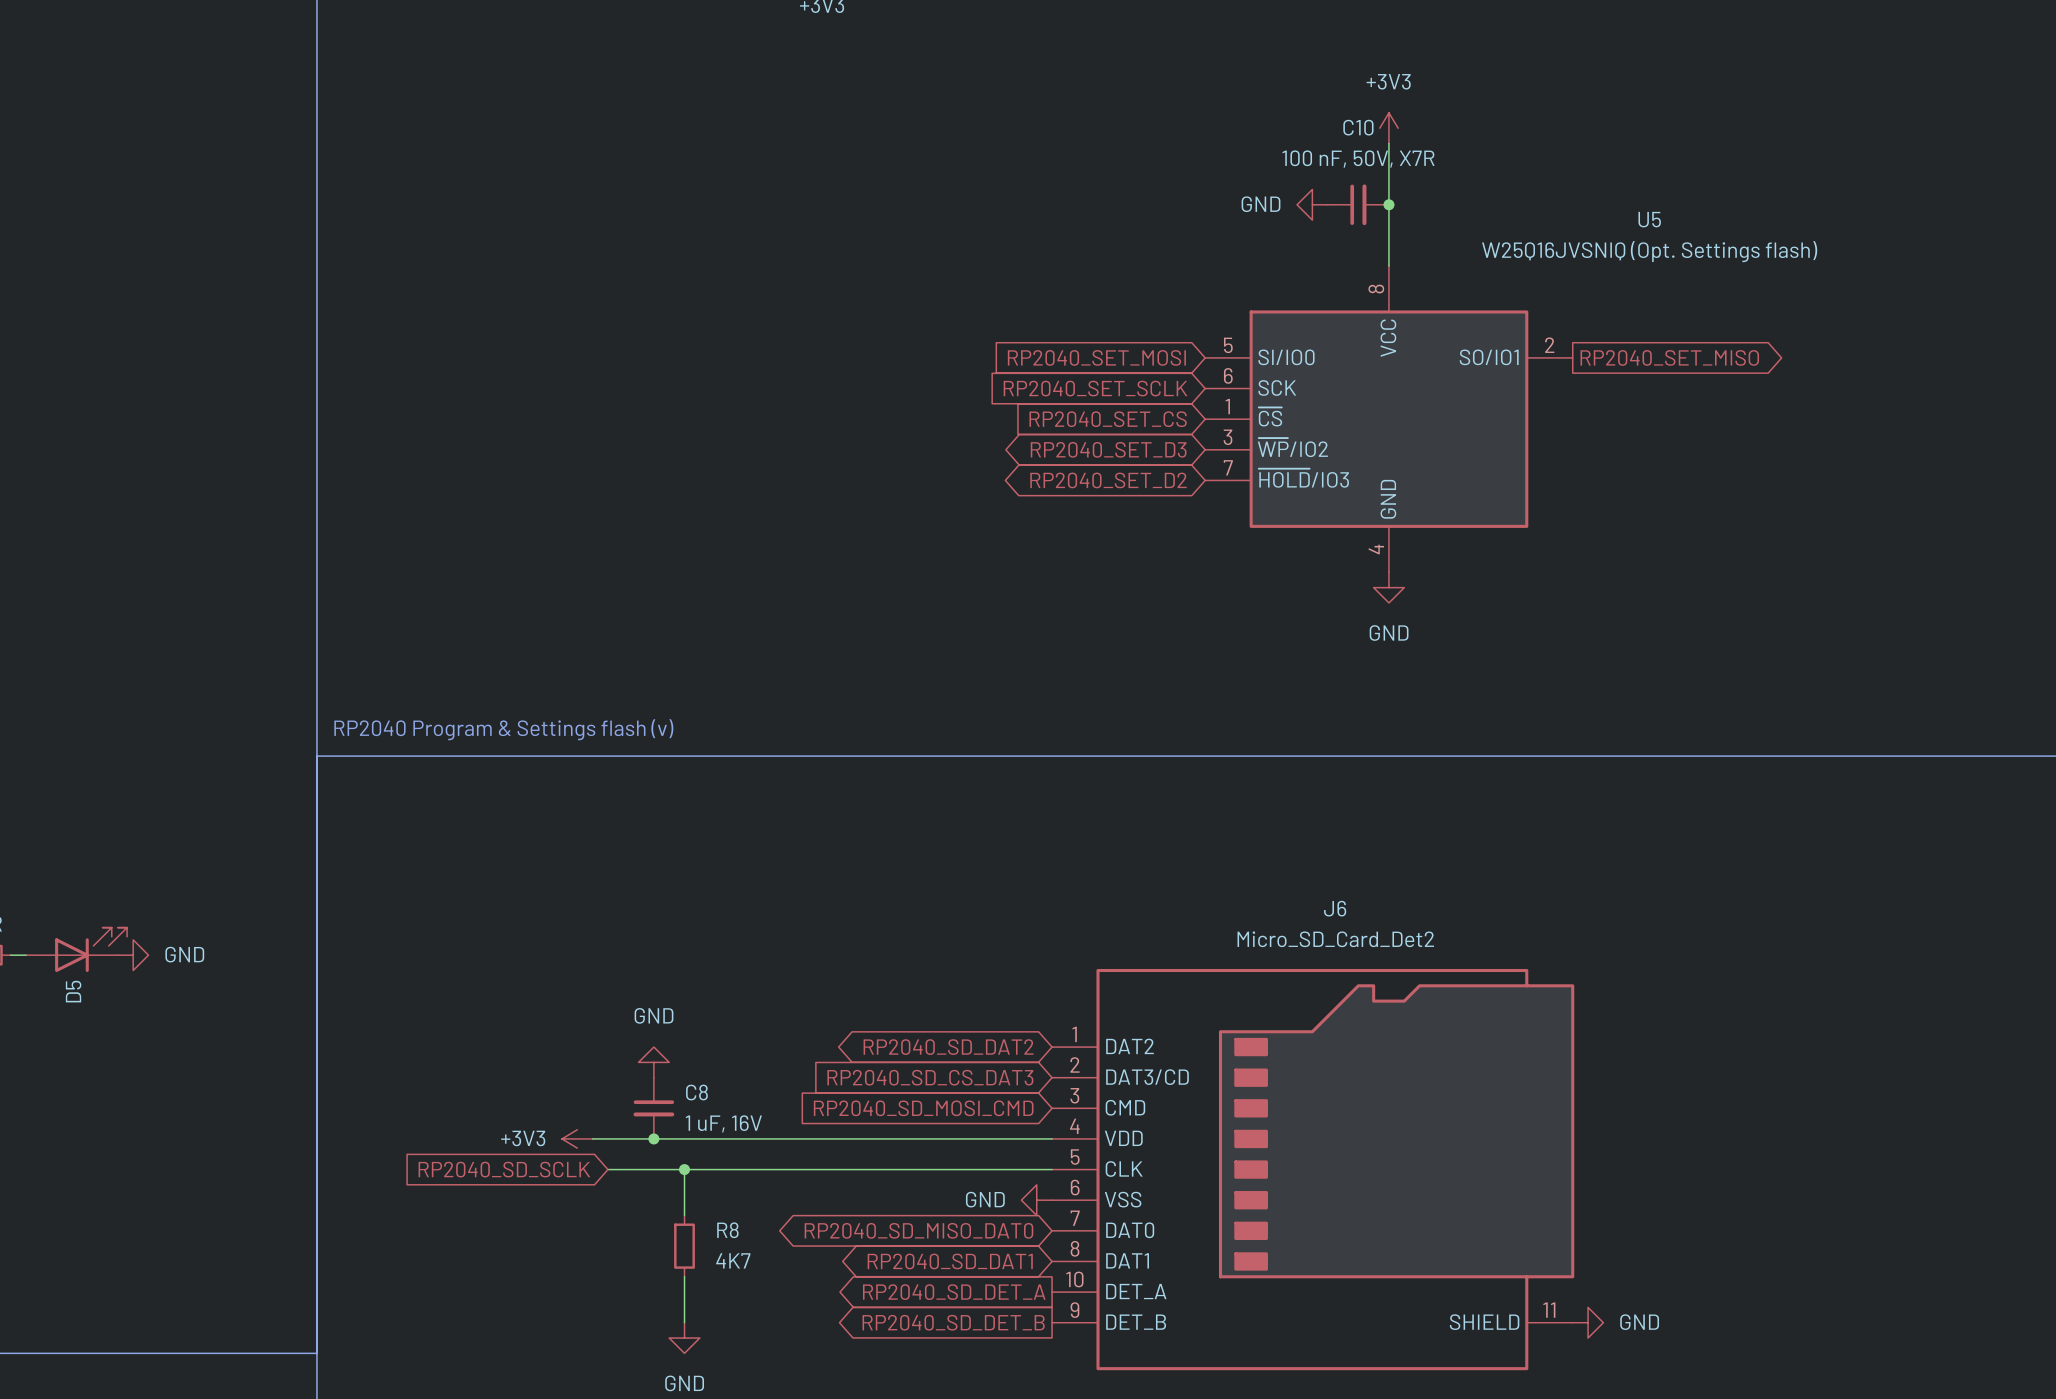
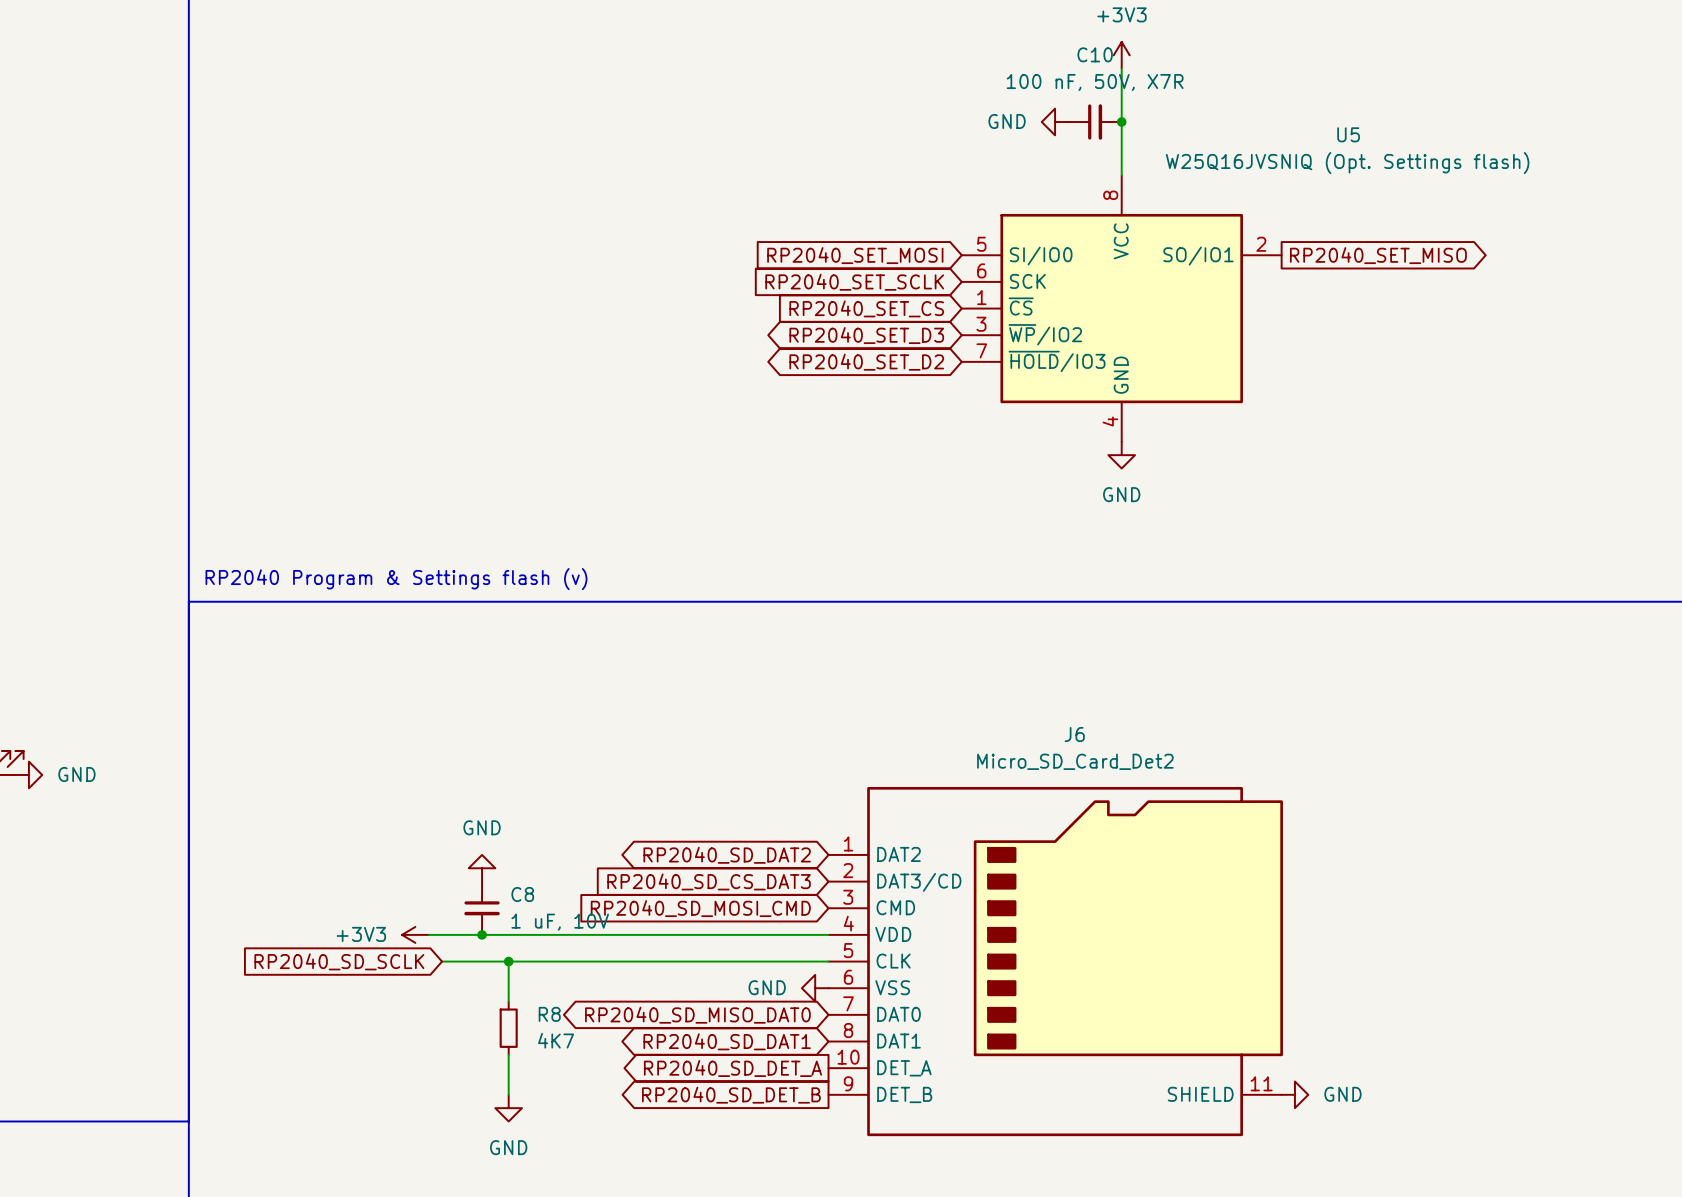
C8 value: 1 uF, 16V (723, 1123) -> 1 uF, 10V (560, 922)

